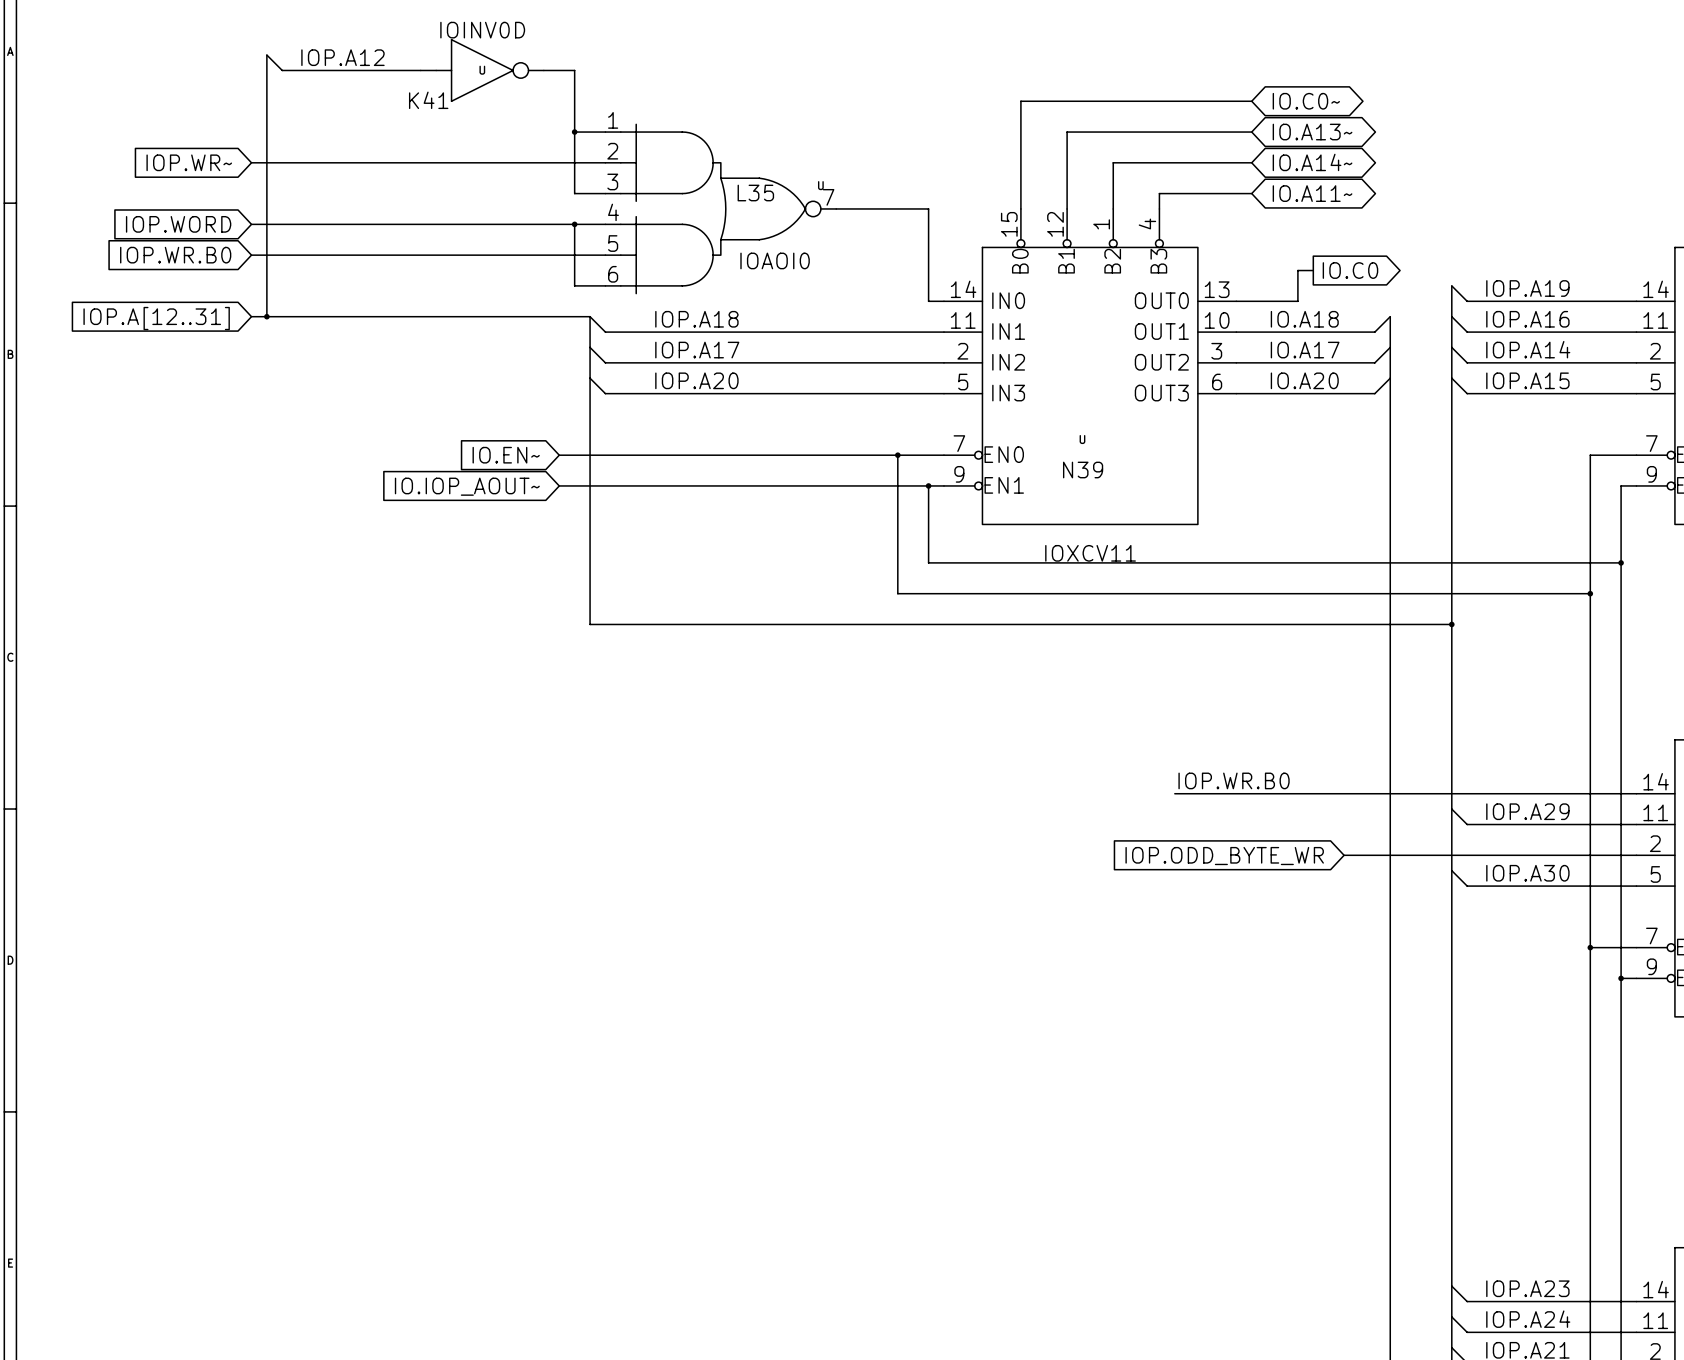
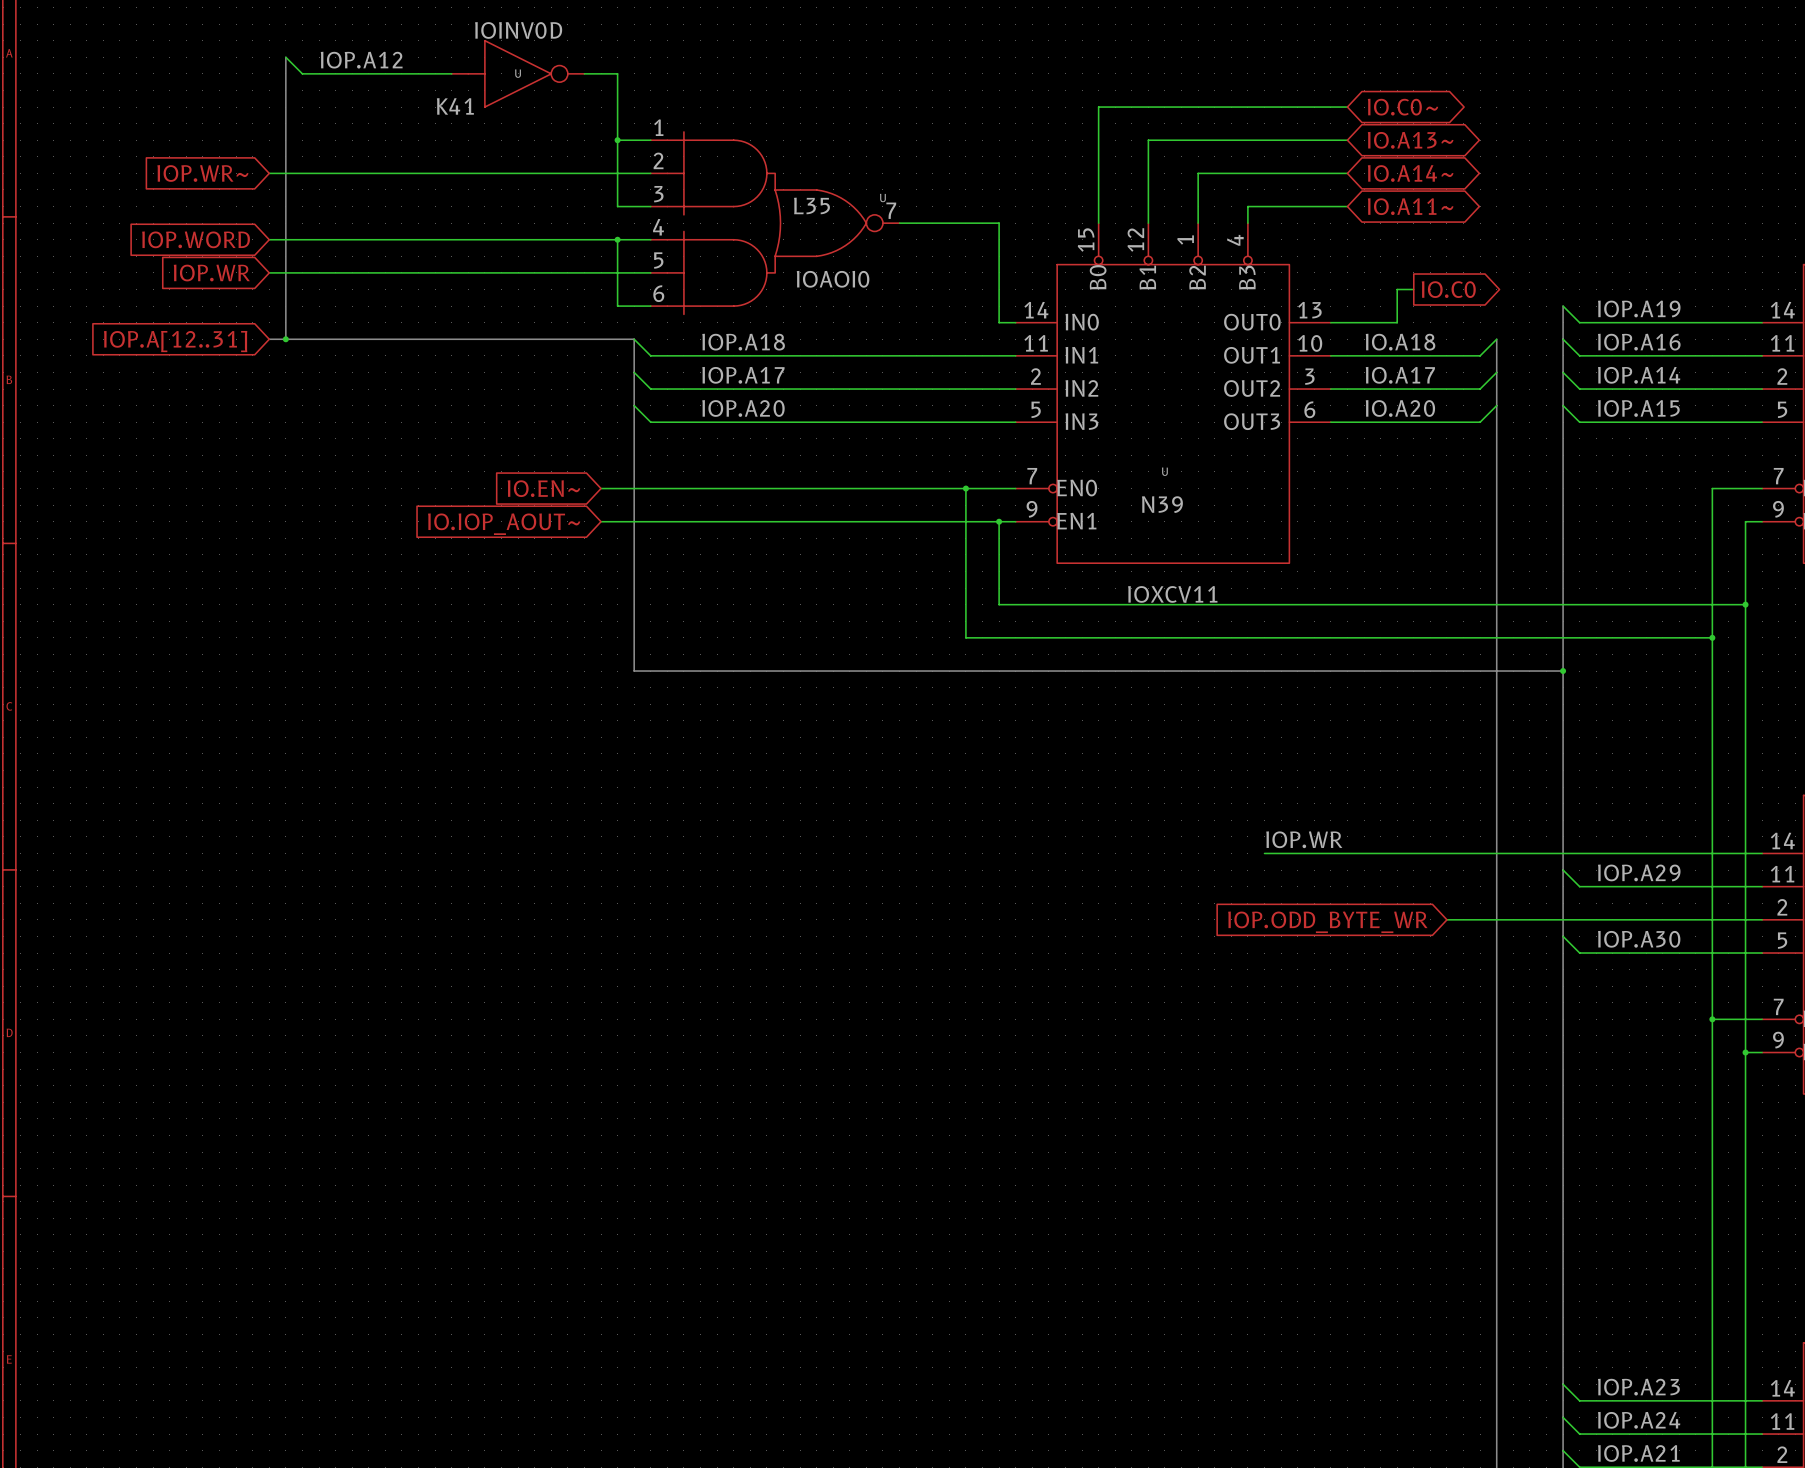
global label: IOP.WR.B0 (175, 255) -> IOP.WR (211, 273)
label: IOP.WR.B0 (1234, 780) -> IOP.WR (1304, 839)

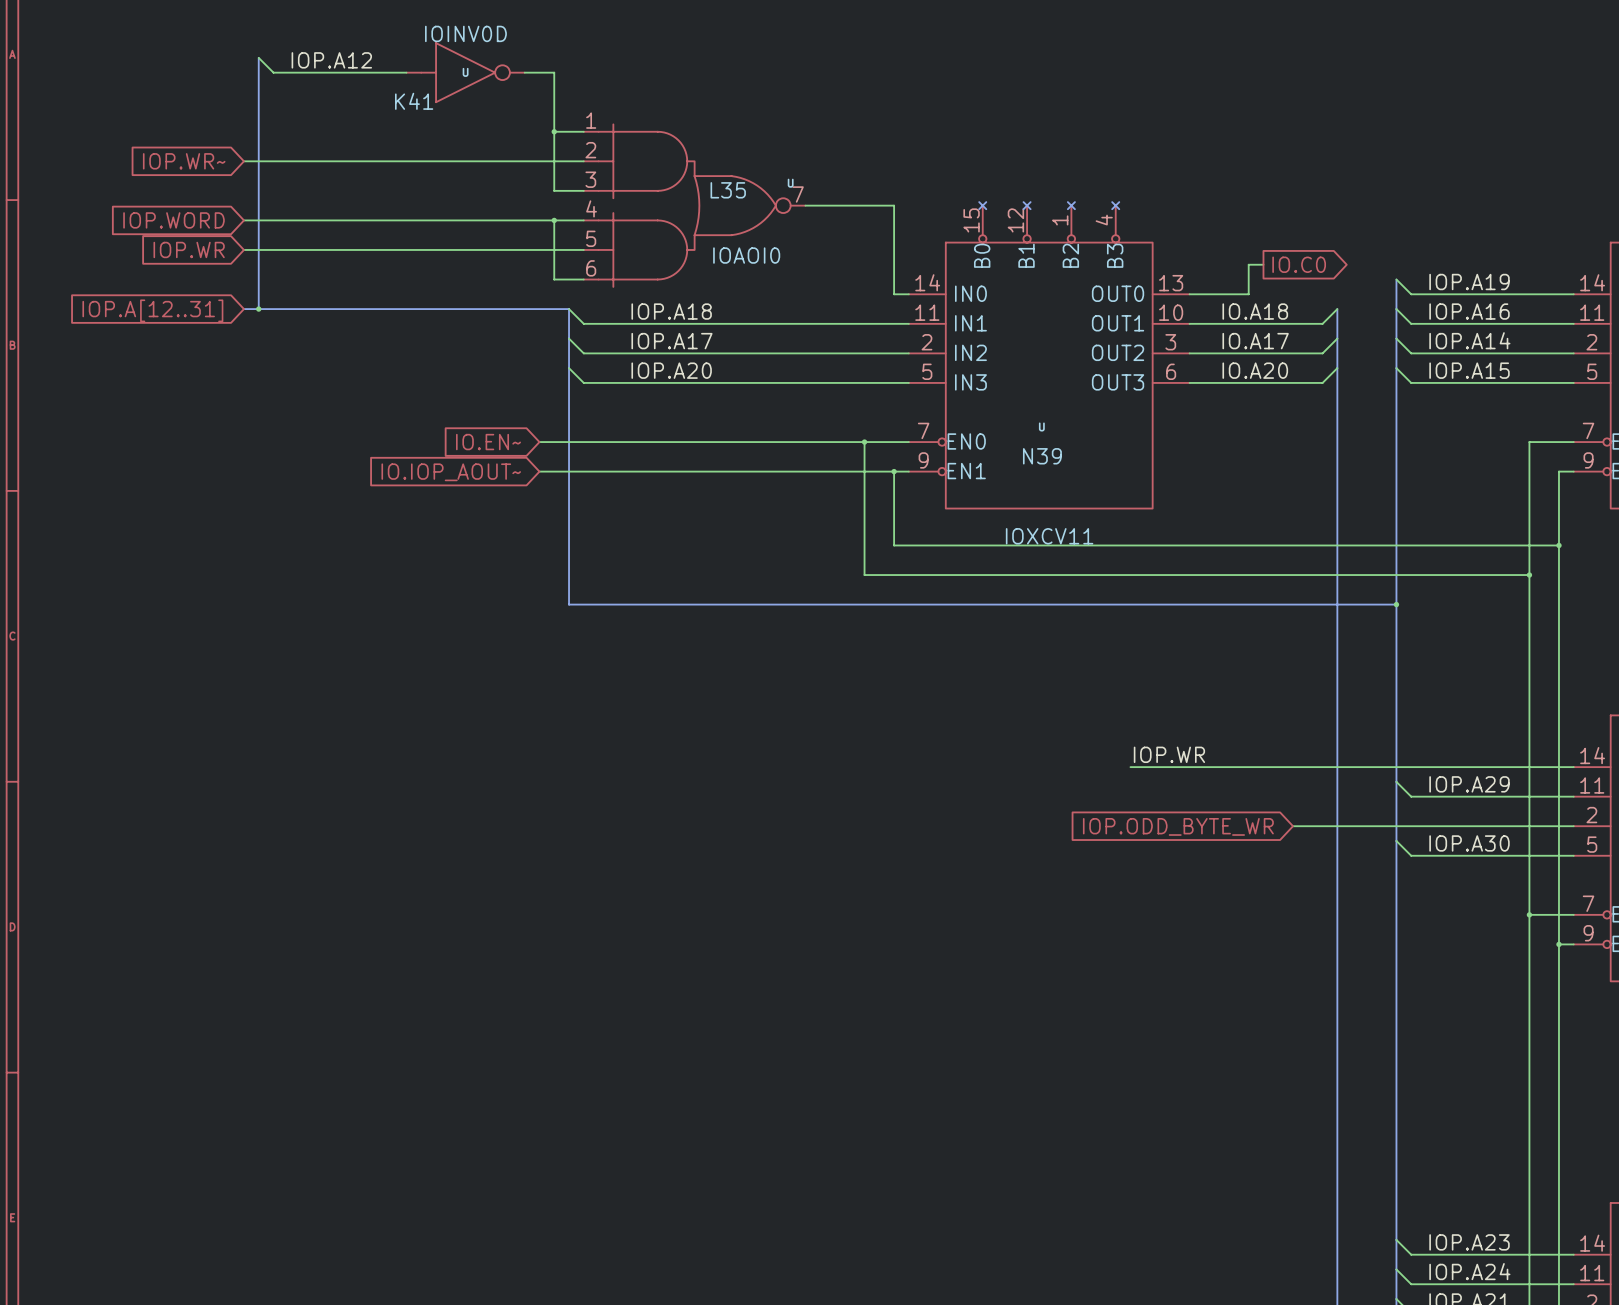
wire: (1347, 107) (1098, 107) (1098, 223) -> none
global label: IO.C0~ (1403, 107) -> none
wire: (1347, 140) (1148, 140) (1148, 223) -> none
global label: IO.A13~ (1410, 140) -> none
wire: (1347, 173) (1198, 173) (1198, 223) -> none
global label: IO.A14~ (1410, 173) -> none
wire: (1347, 206) (1247, 206) (1247, 223) -> none
global label: IO.A11~ (1410, 206) -> none
no-connect mark: none -> (982, 205)
no-connect mark: none -> (1027, 205)
no-connect mark: none -> (1071, 205)
no-connect mark: none -> (1115, 205)

